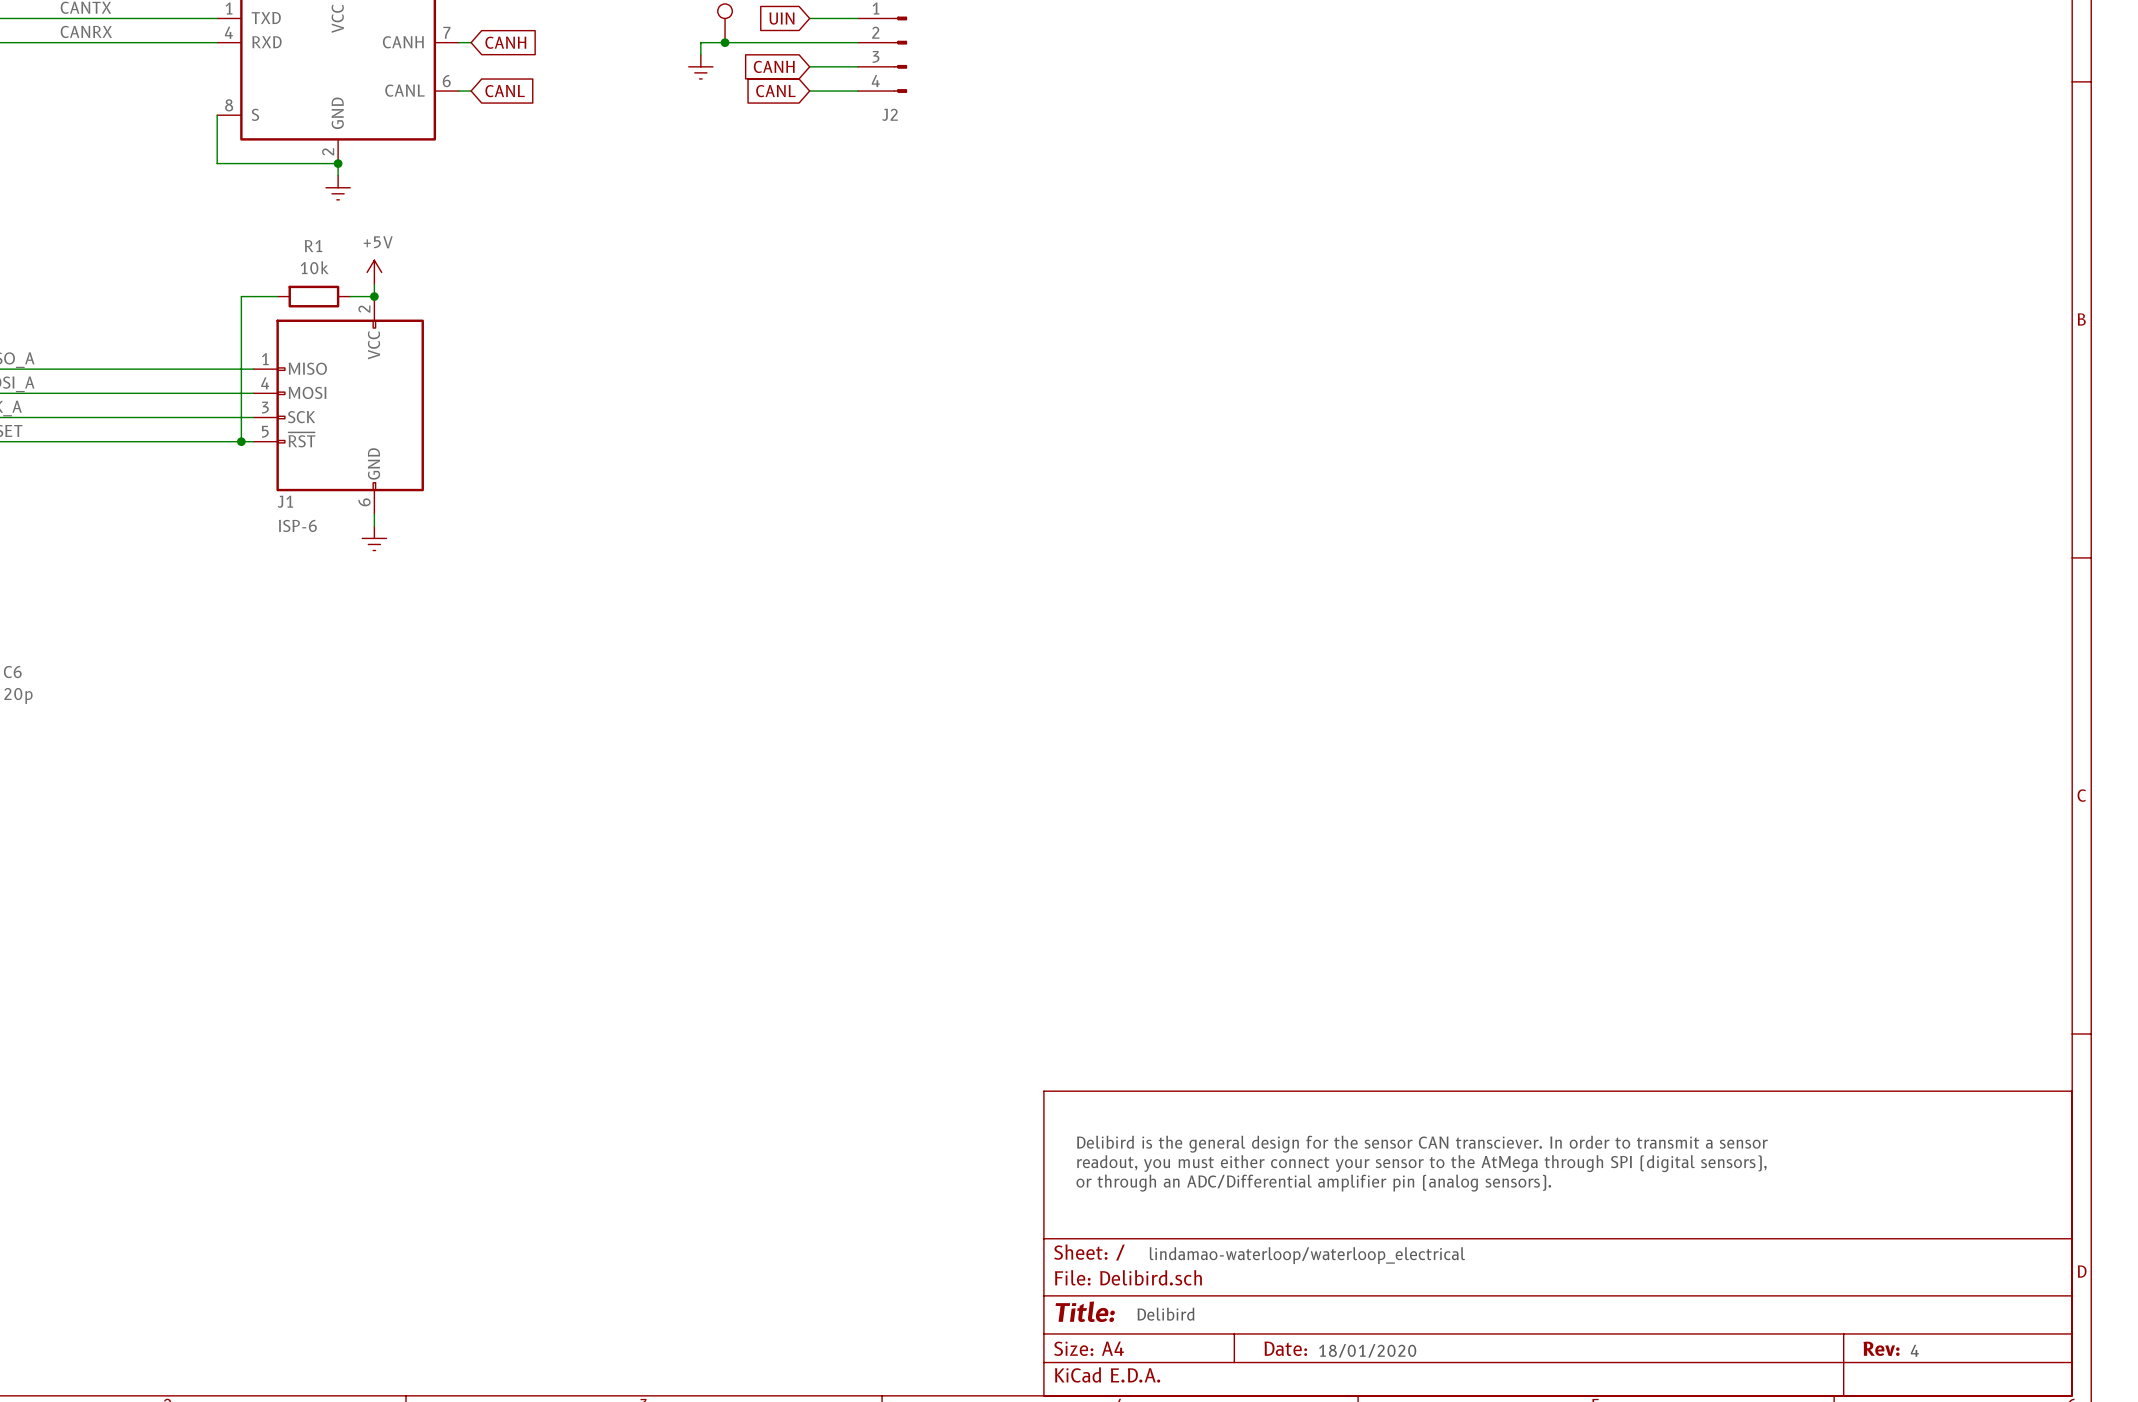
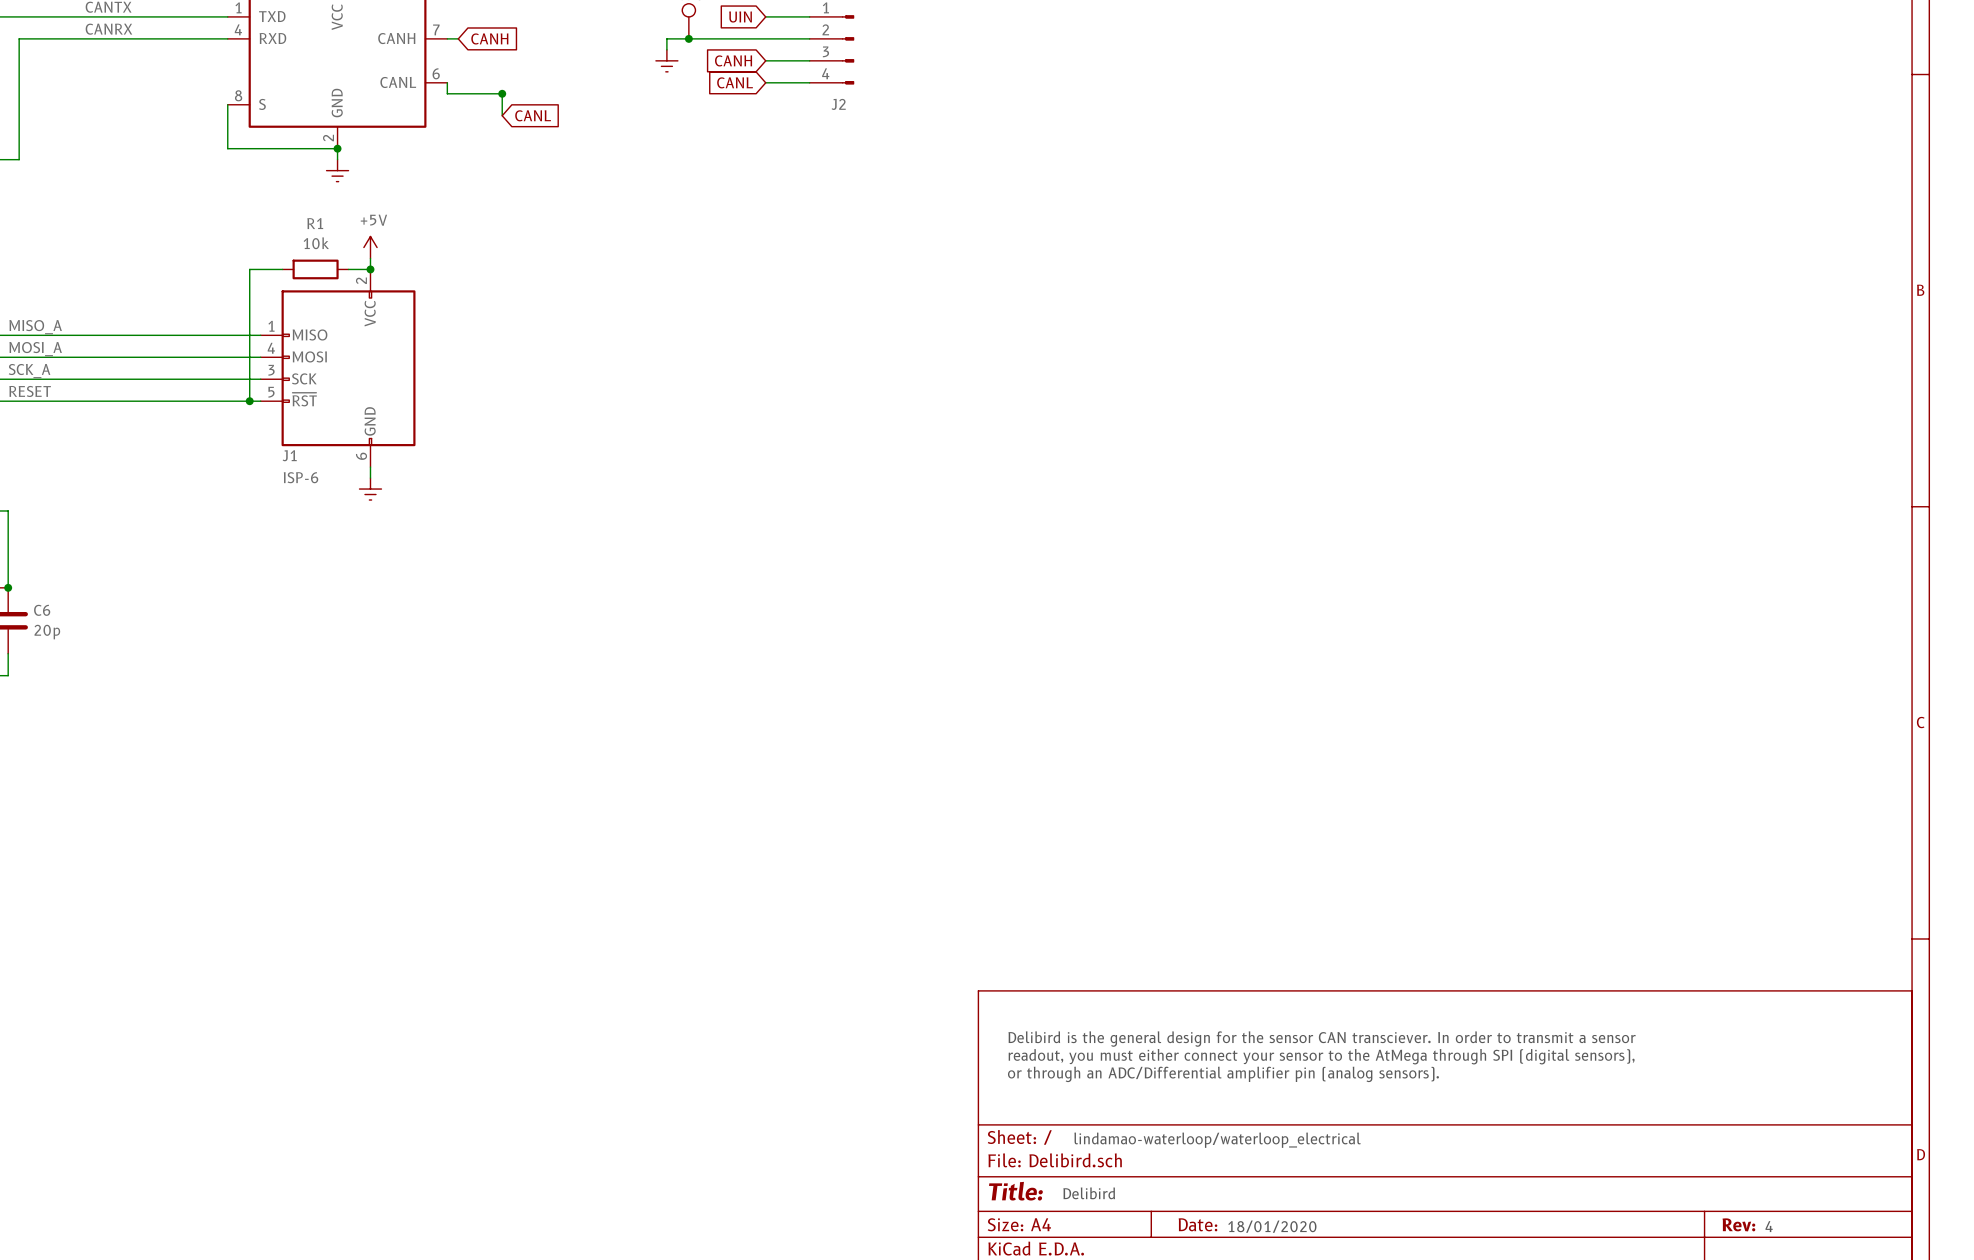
wire: (459, 91) (471, 91) -> (447, 82) (447, 93) (502, 93) (502, 115)
global label position: CANL (505, 91) -> CANL (533, 115)
junction: none -> (502, 93)

